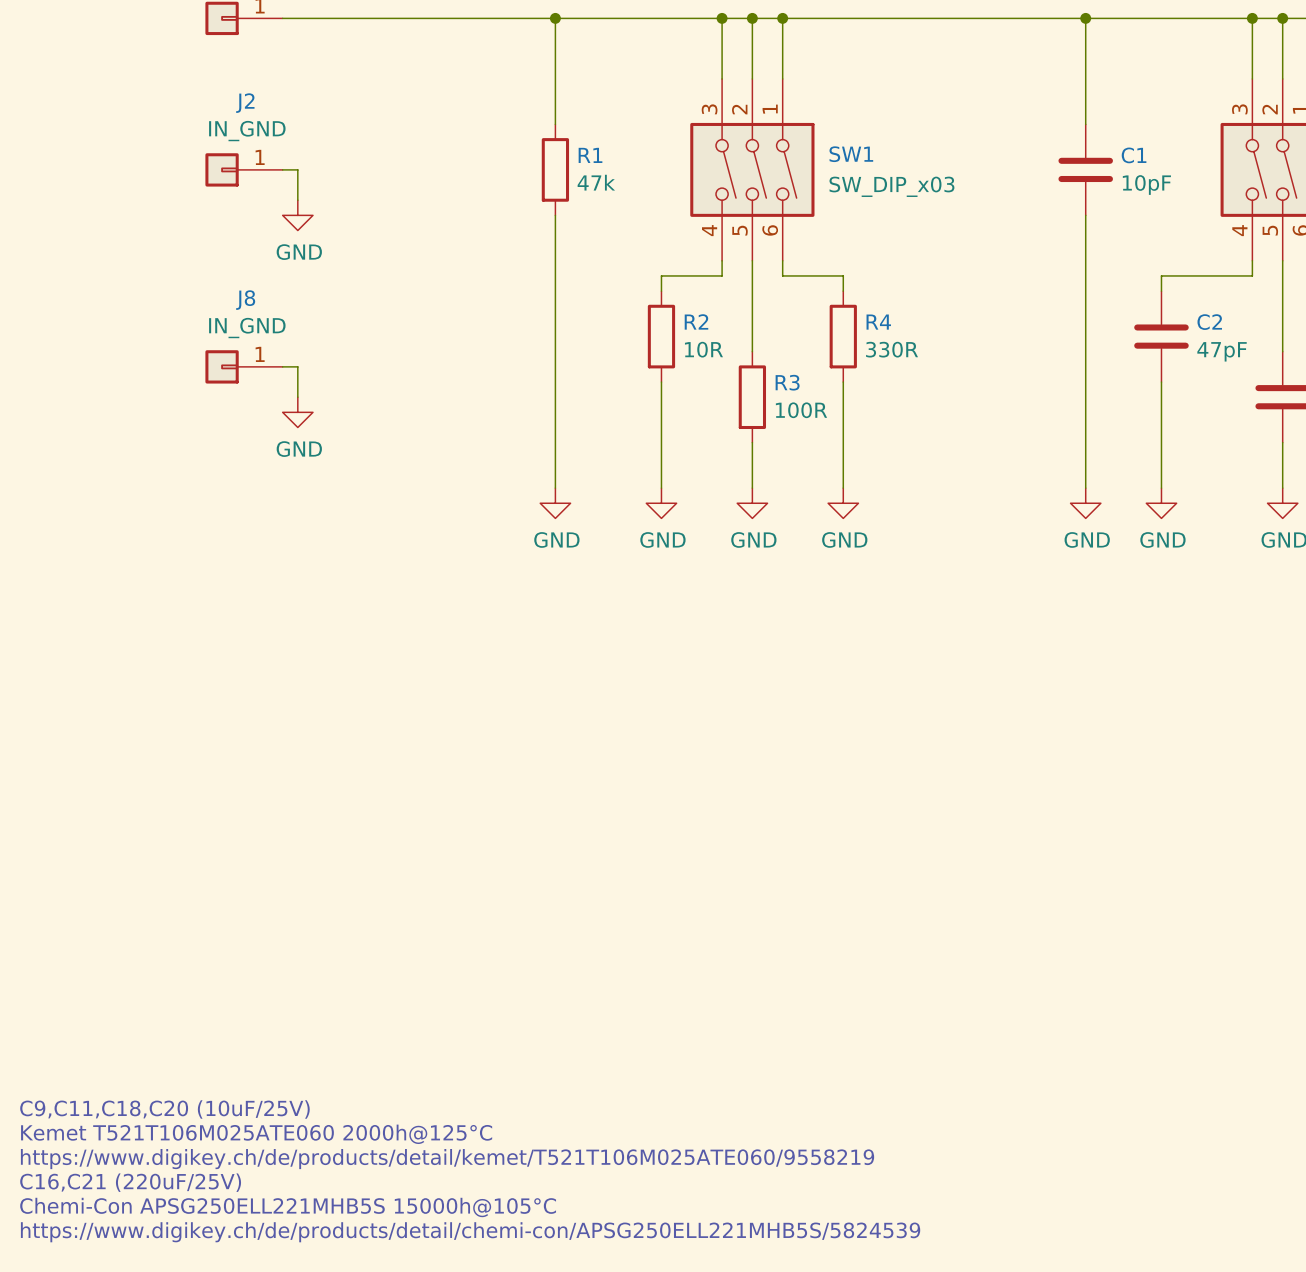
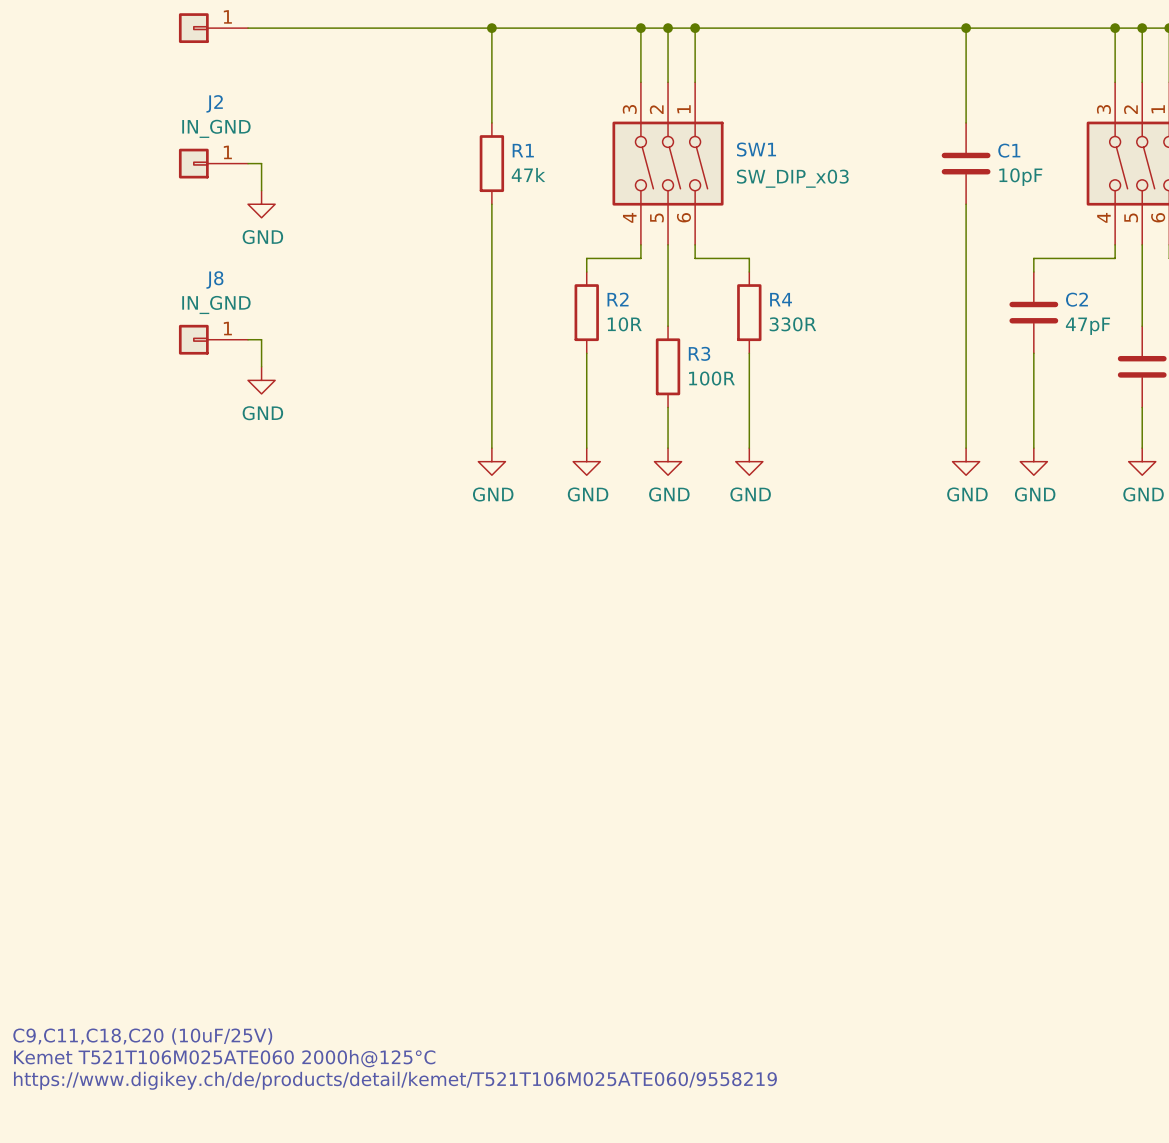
text position: C9,C11,C18,C20 (10uF/25V) (164, 1109) -> C9,C11,C18,C20 (10uF/25V) (142, 1036)
text position: Kemet T521T106M025ATE060 2000h@125°C (256, 1134) -> Kemet T521T106M025ATE060 2000h@125°C (224, 1058)
text position: https://www.digikey.ch/de/products/detail/kemet/T521T106M025ATE060/9558219 (447, 1159) -> https://www.digikey.ch/de/products/detail/kemet/T521T106M025ATE060/9558219 (395, 1080)
text: C16,C21 (220uF/25V) (130, 1182) -> none
text: Chemi-Con APSG250ELL221MHB5S 15000h@105°C (288, 1207) -> none
text: https://www.digikey.ch/de/products/detail/chemi-con/APSG250ELL221MHB5S/5824539 (470, 1232) -> none

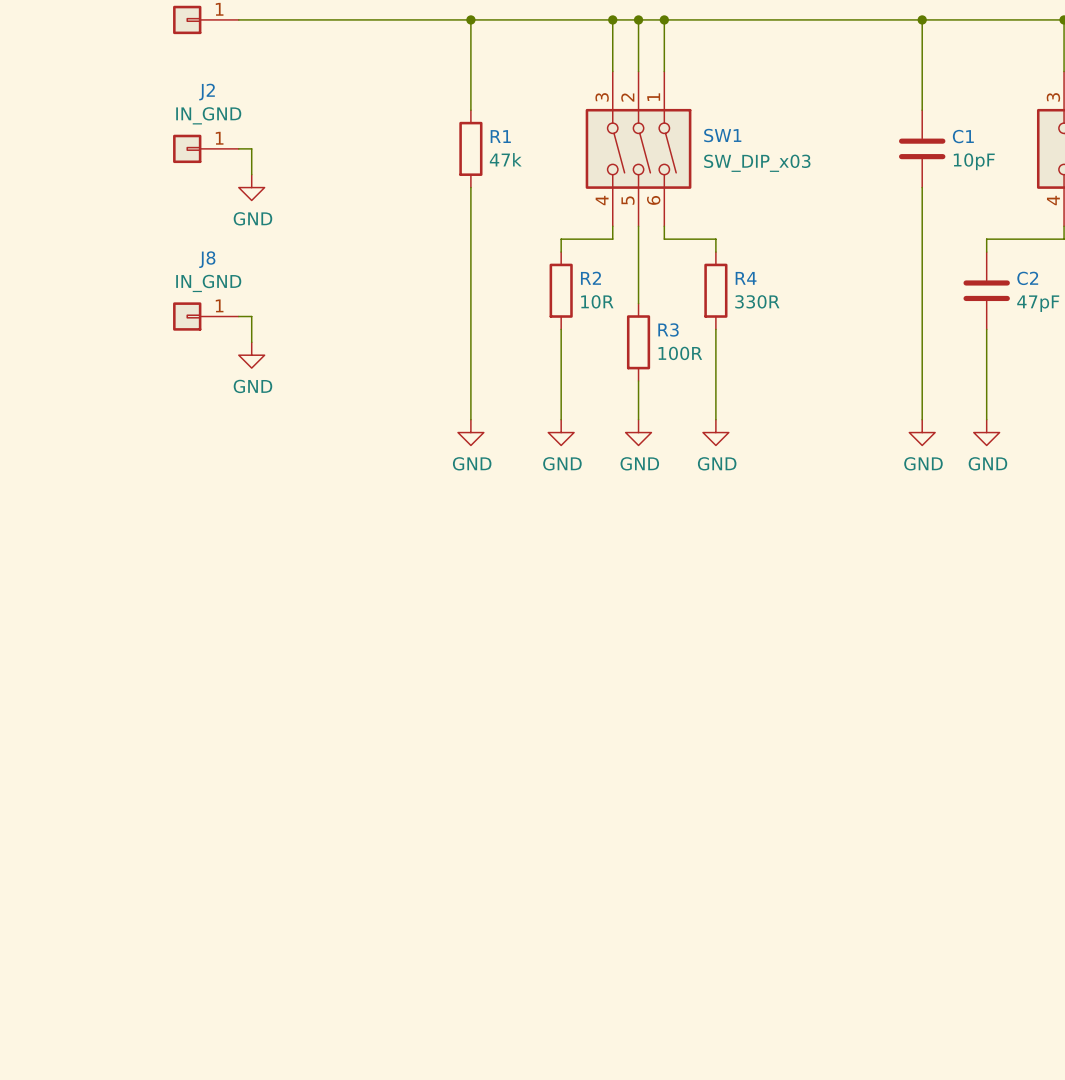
text: C9,C11,C18,C20 (10uF/25V) (142, 1036) -> none
text: Kemet T521T106M025ATE060 2000h@125°C (224, 1058) -> none
text: https://www.digikey.ch/de/products/detail/kemet/T521T106M025ATE060/9558219 (395, 1080) -> none

